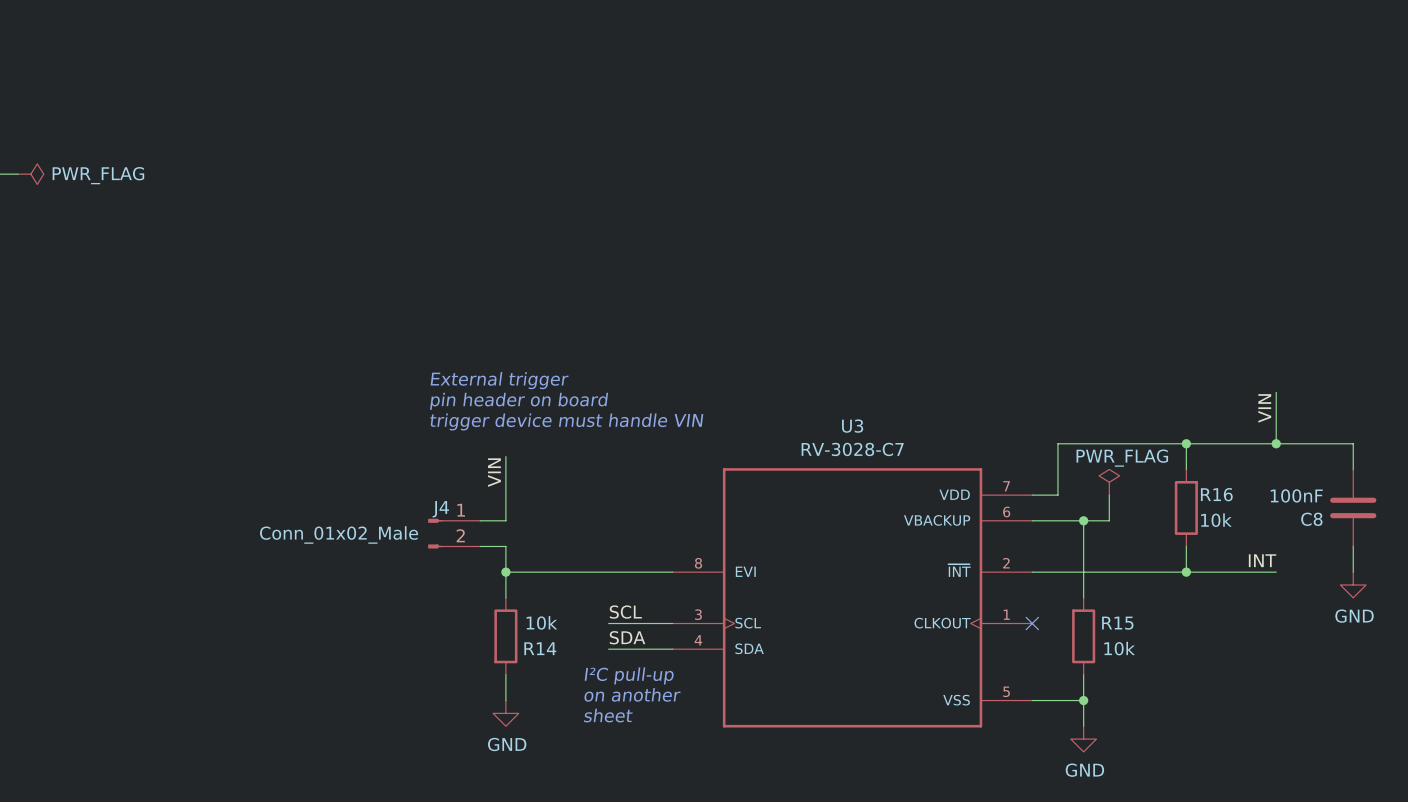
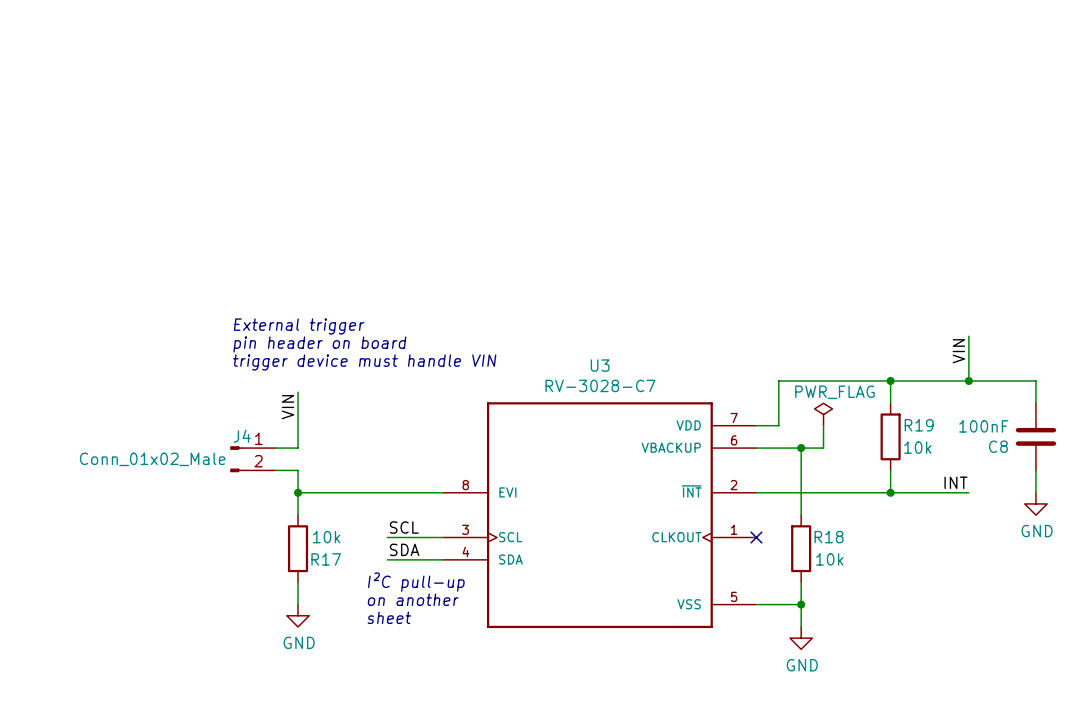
R16 name: R16 (1216, 494) -> R19 (919, 425)
R15 name: R15 (1117, 623) -> R18 (829, 537)
R14 name: R14 (540, 648) -> R17 (326, 559)

